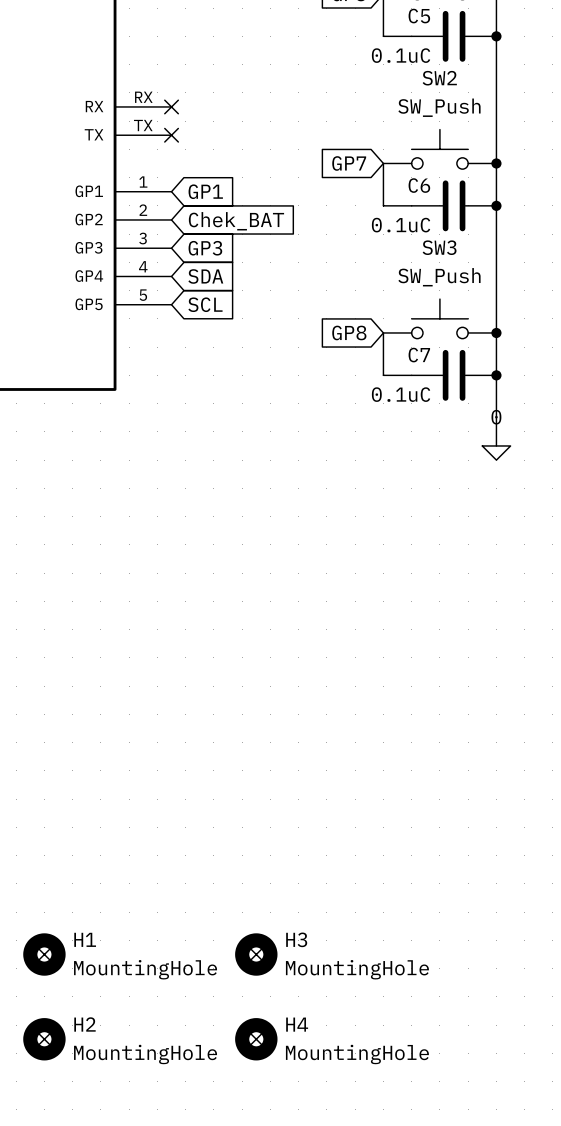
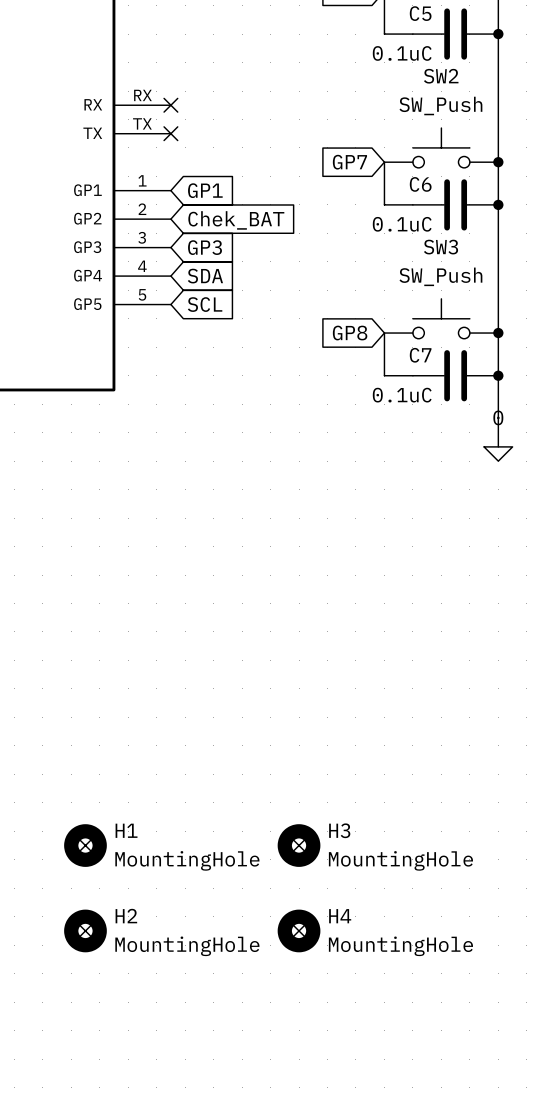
no-connect mark: none -> (85, 845)
no-connect mark: none -> (299, 845)
no-connect mark position: (44, 954) -> (85, 930)
H1 position: (44, 954) -> (85, 845)
no-connect mark position: (256, 954) -> (299, 930)
H3 position: (256, 954) -> (299, 845)
no-connect mark: (44, 1039) -> none
H2 position: (44, 1039) -> (85, 930)
no-connect mark: (256, 1039) -> none
H4 position: (256, 1039) -> (299, 930)

